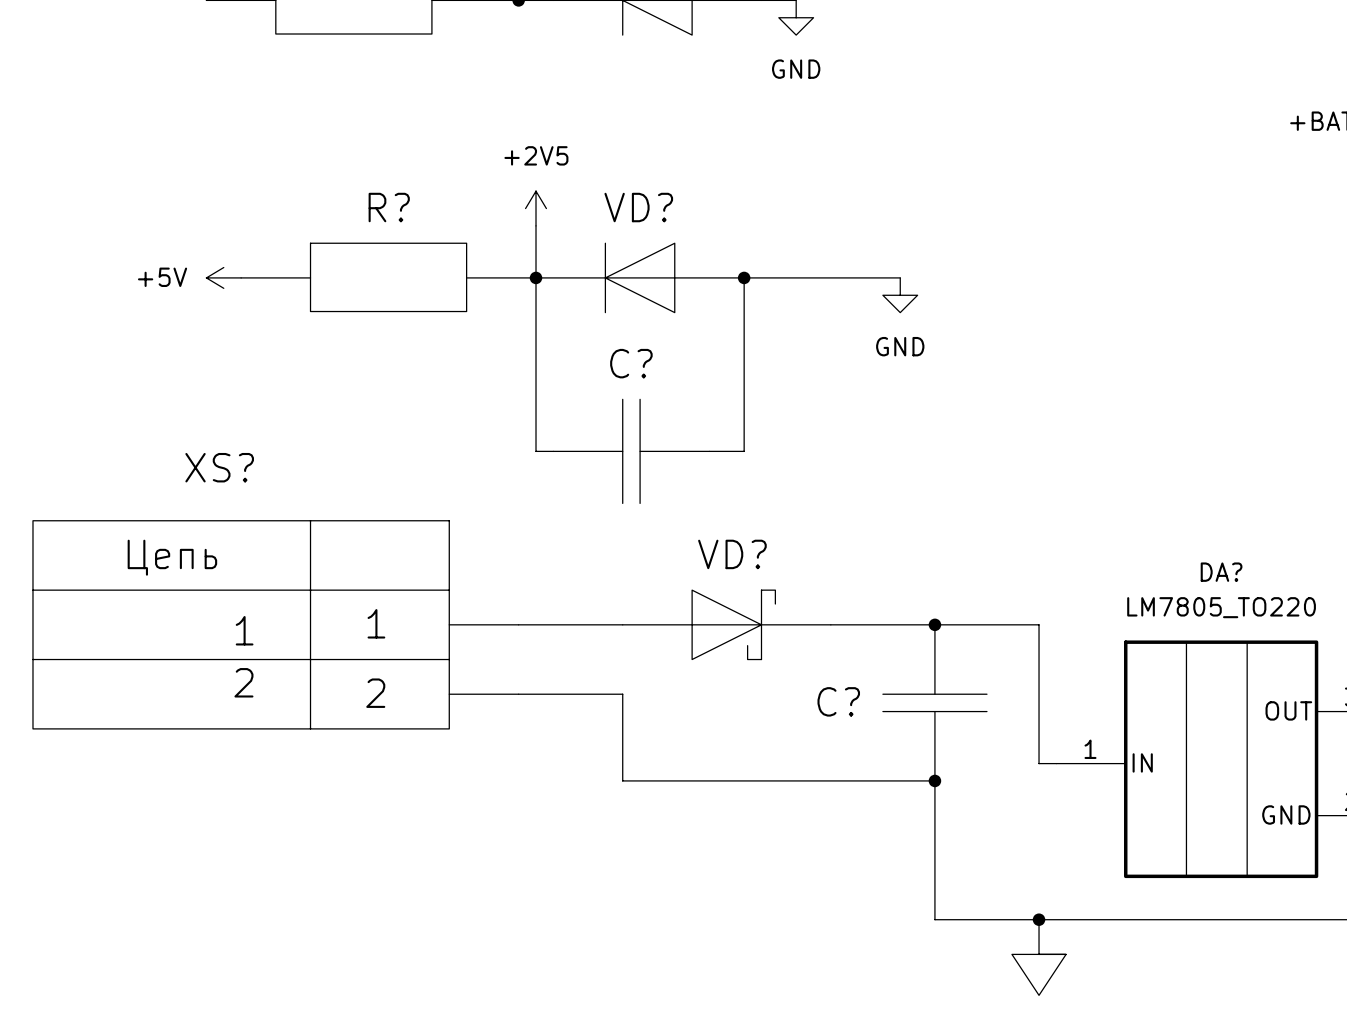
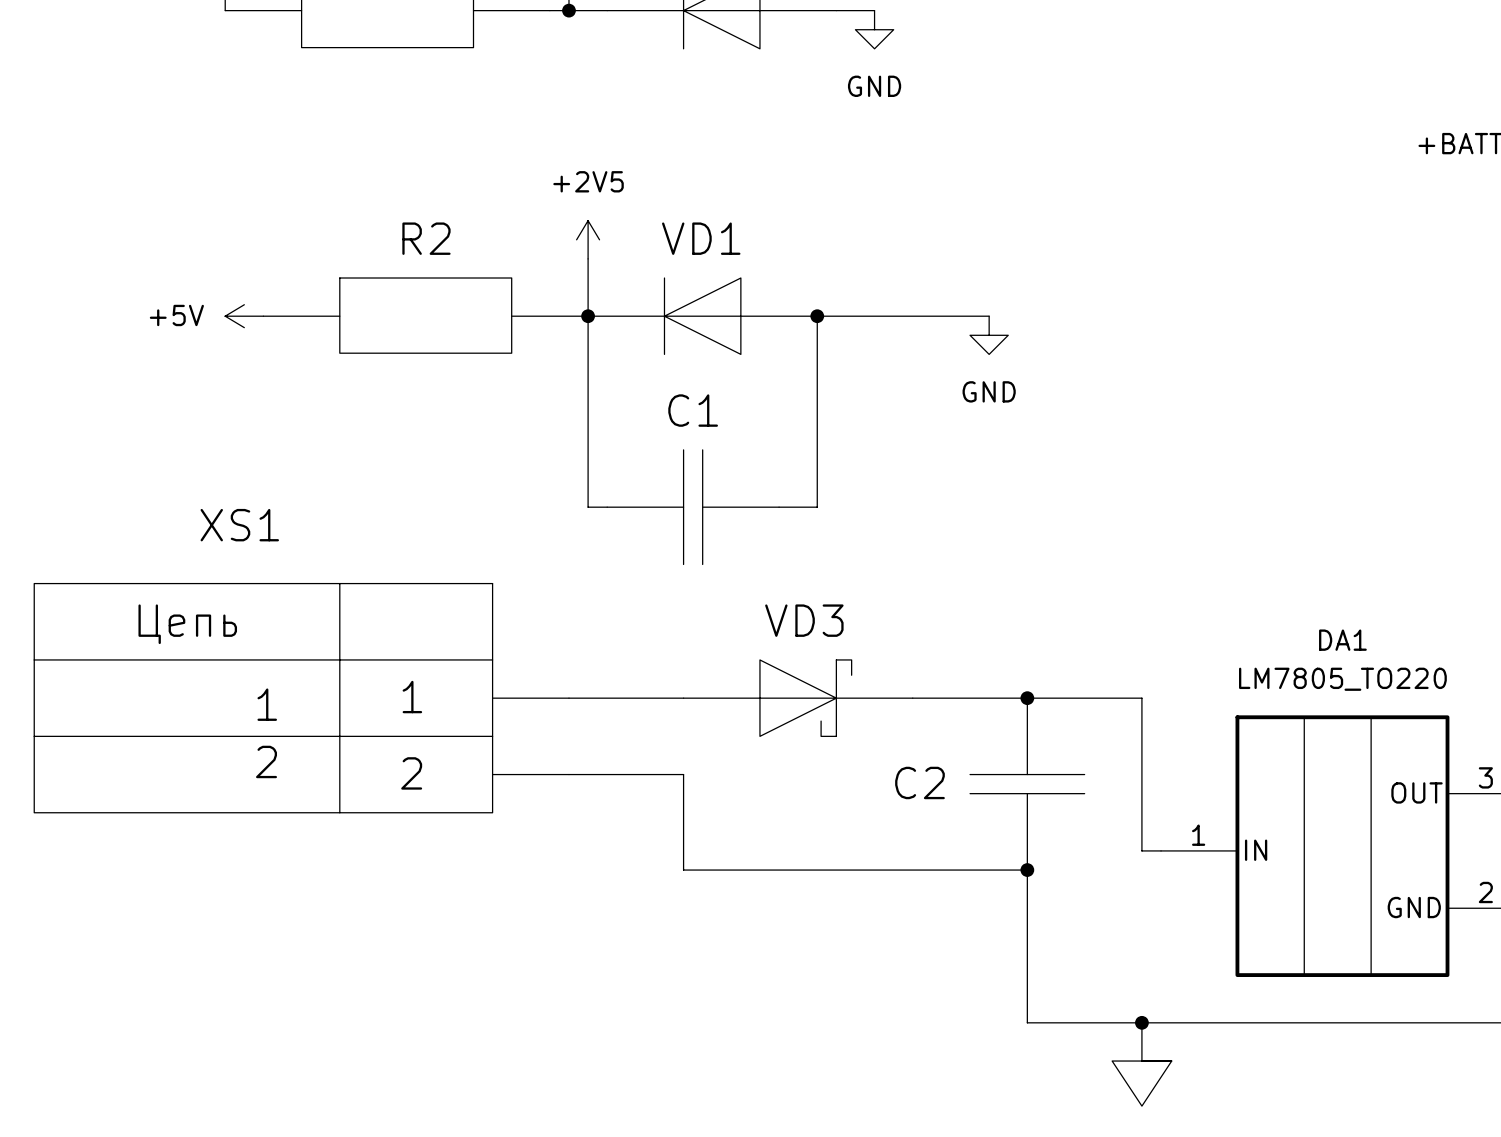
R? name: R? (389, 207) -> R2 (426, 238)
VD? name: VD? (638, 207) -> VD1 (701, 238)
C? name: C? (631, 363) -> C1 (693, 410)
XS? name: XS? (219, 467) -> XS1 (239, 525)
VD? name: VD? (732, 554) -> VD3 (804, 620)
DA? name: DA? (1221, 572) -> DA1 (1342, 640)
C? name: C? (838, 701) -> C2 (919, 782)

